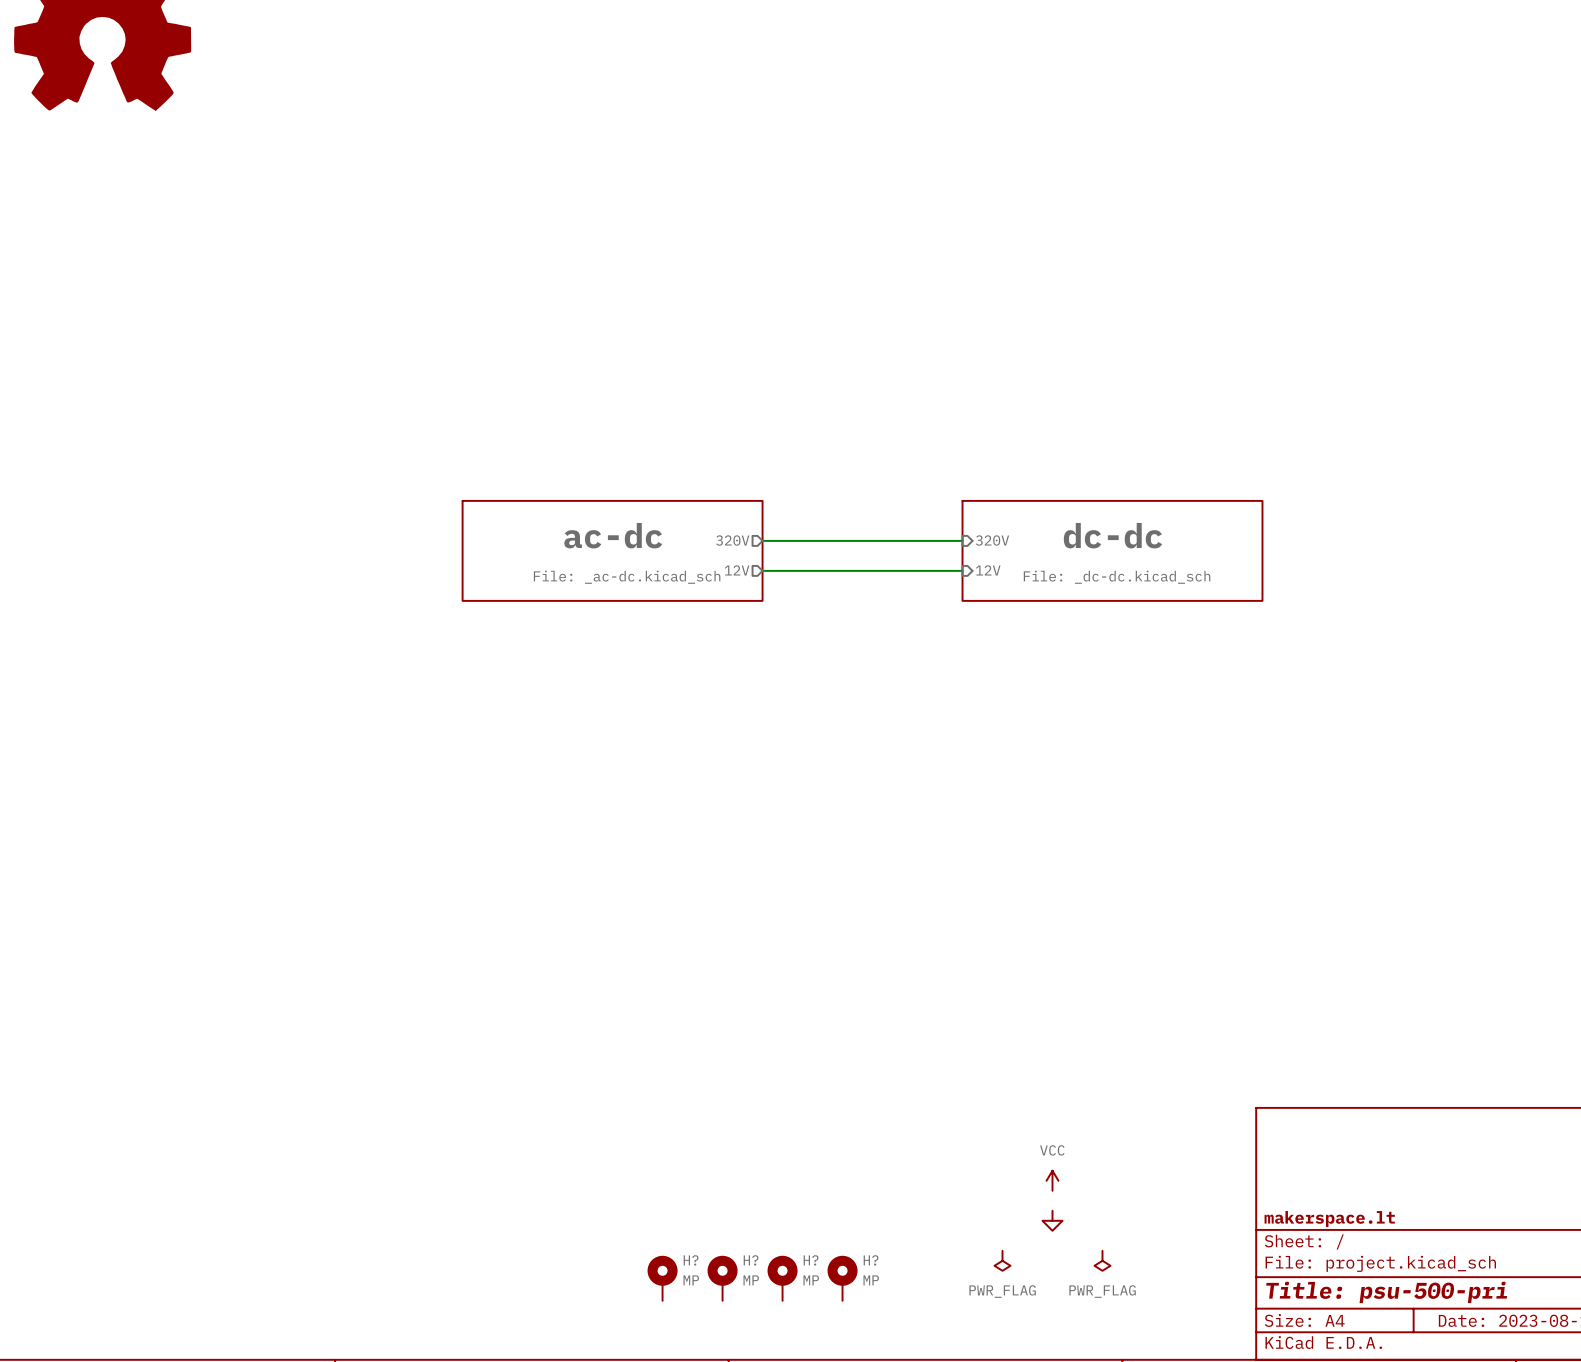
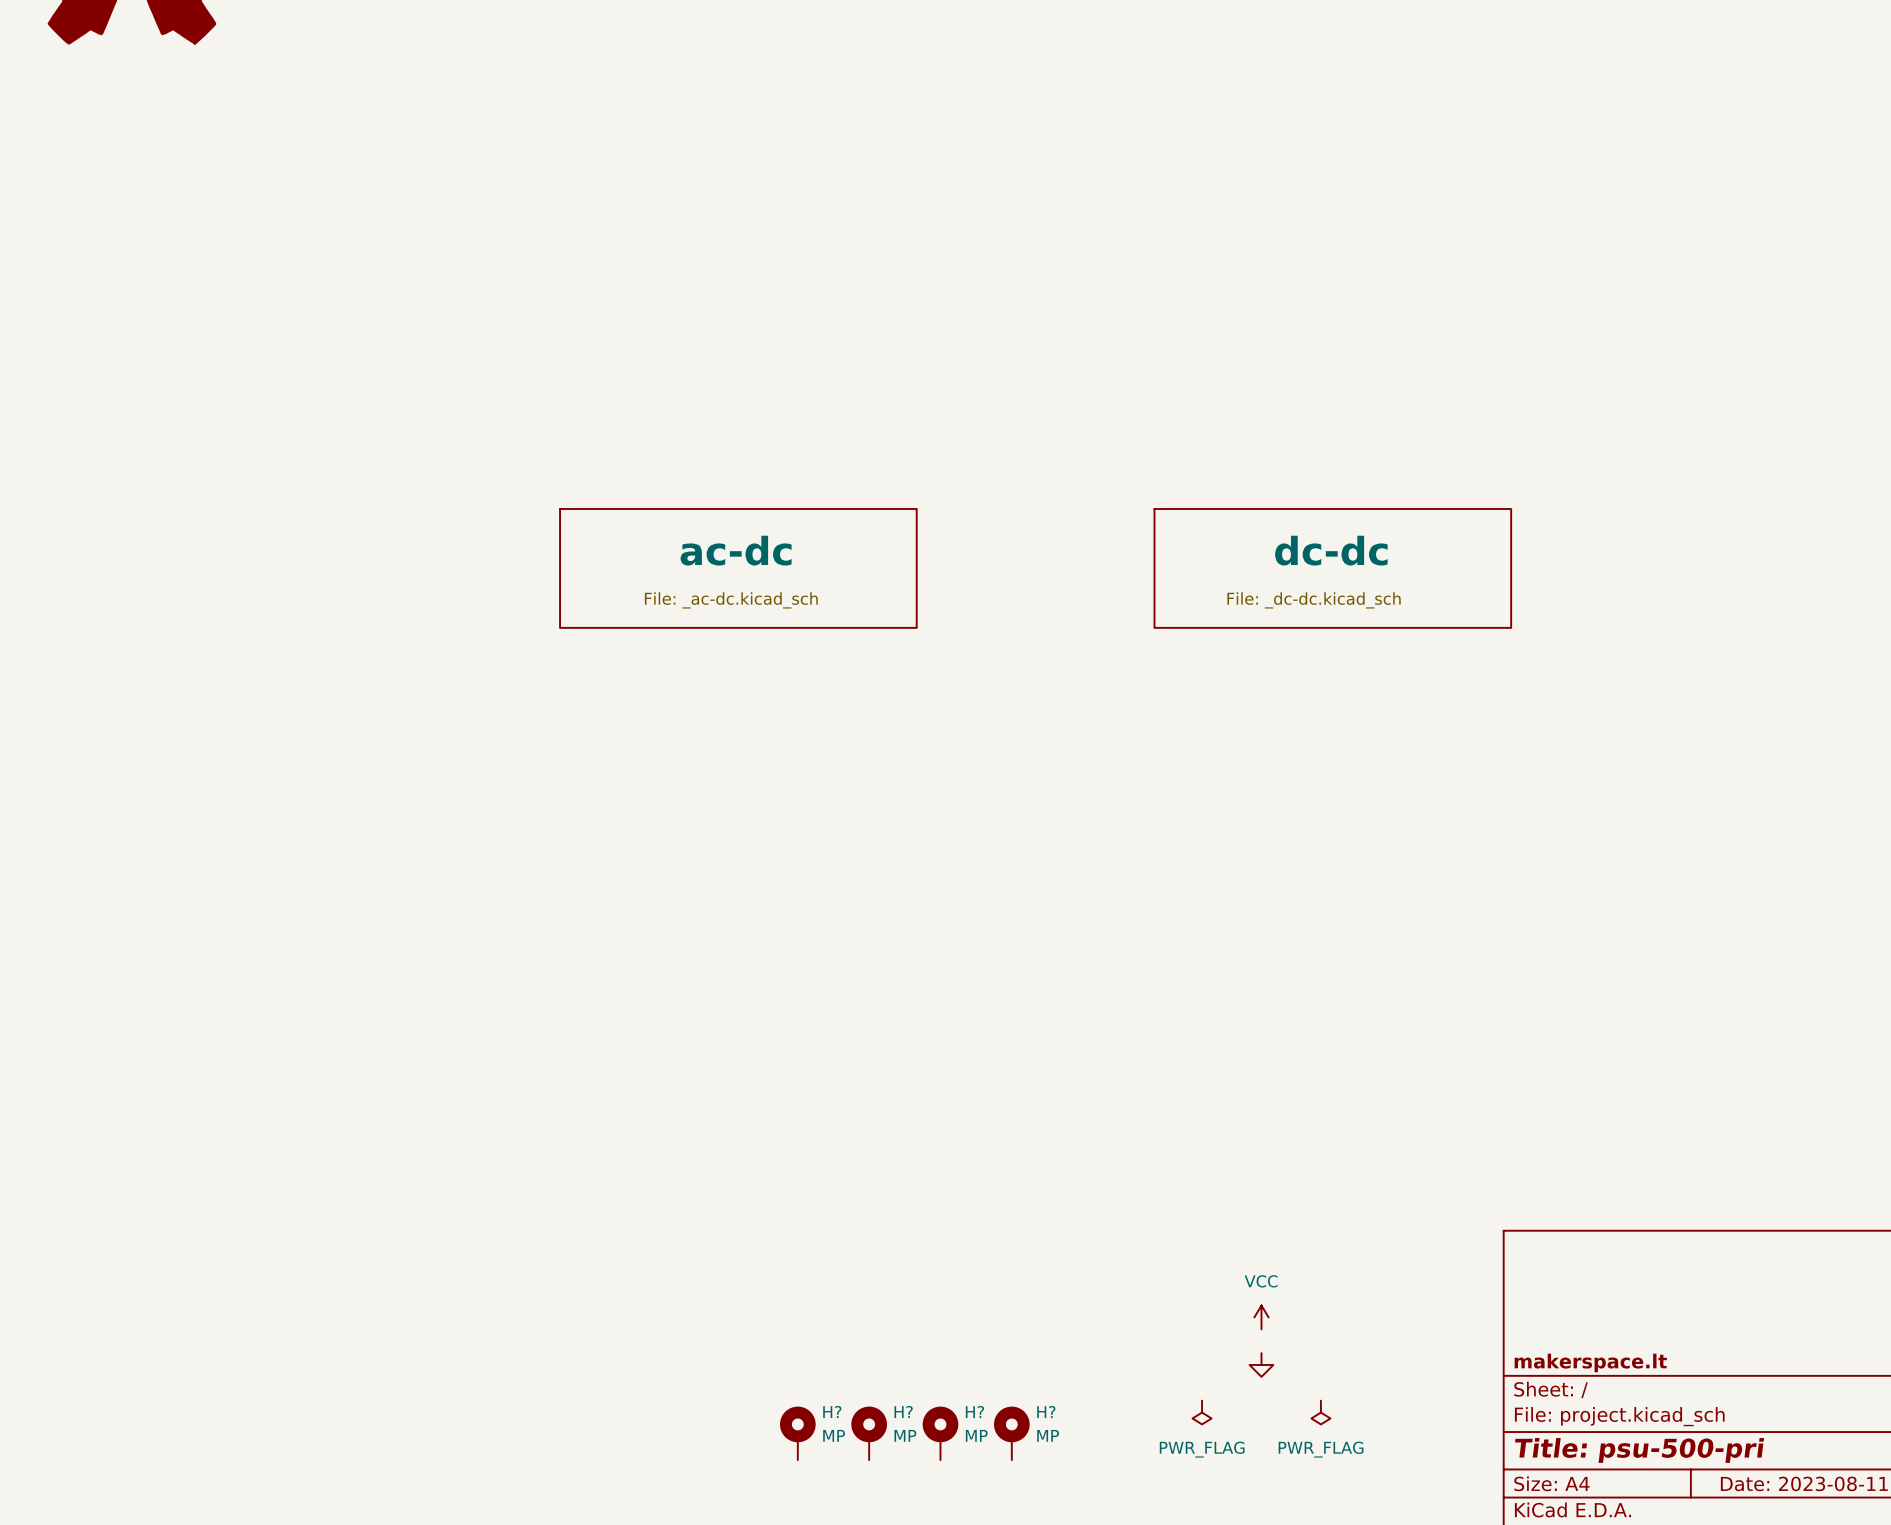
sheet pin: 320V (732, 540) -> none
wire: (762, 540) (962, 540) -> none
sheet pin: 320V (992, 540) -> none
sheet pin: 12V (737, 570) -> none
wire: (762, 570) (962, 570) -> none
sheet pin: 12V (988, 570) -> none

